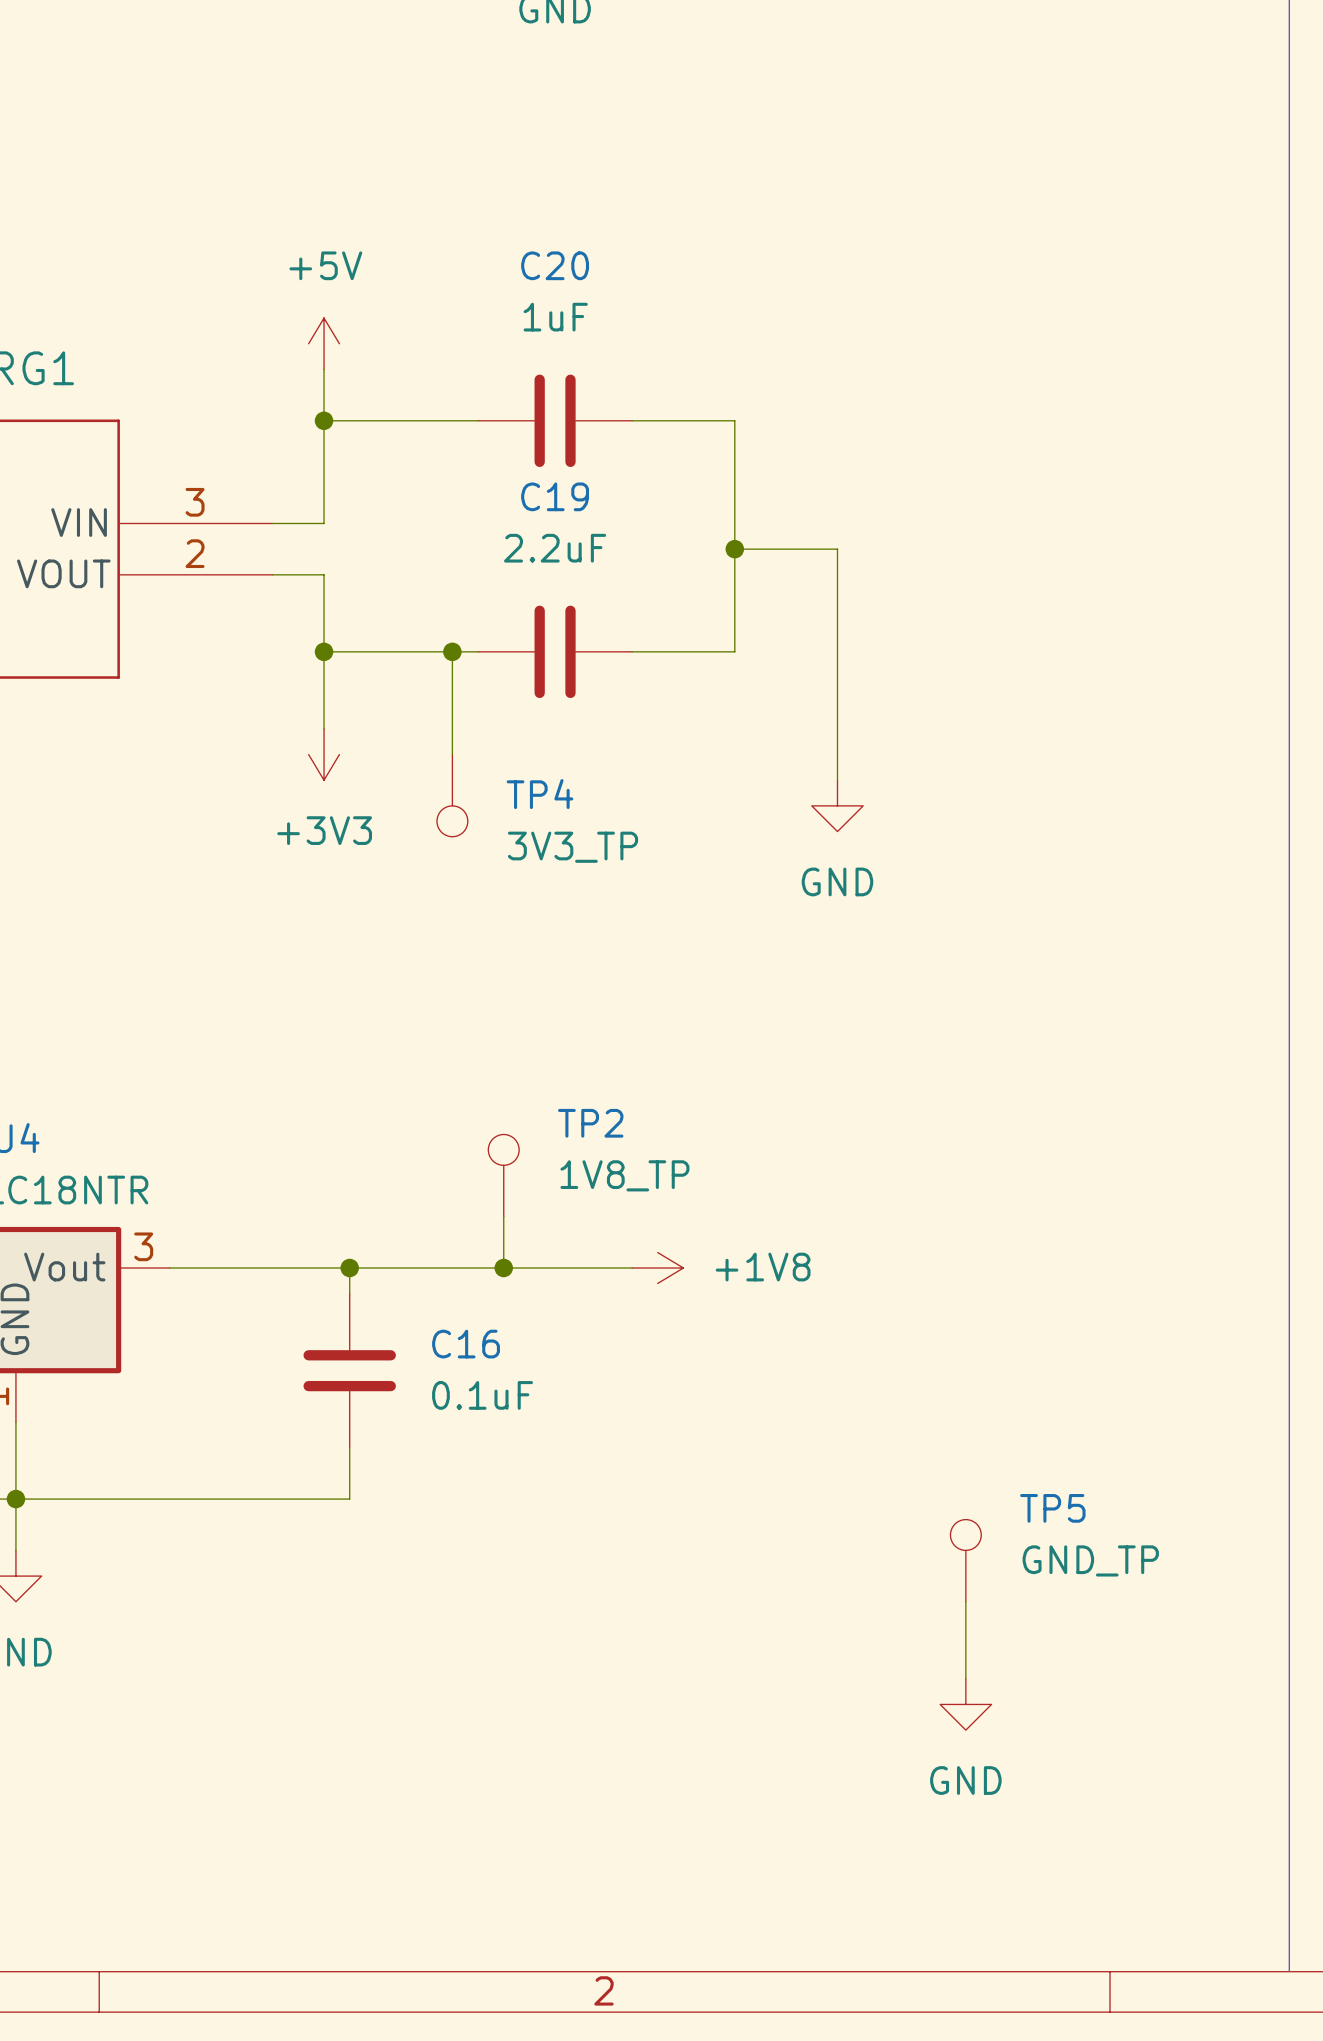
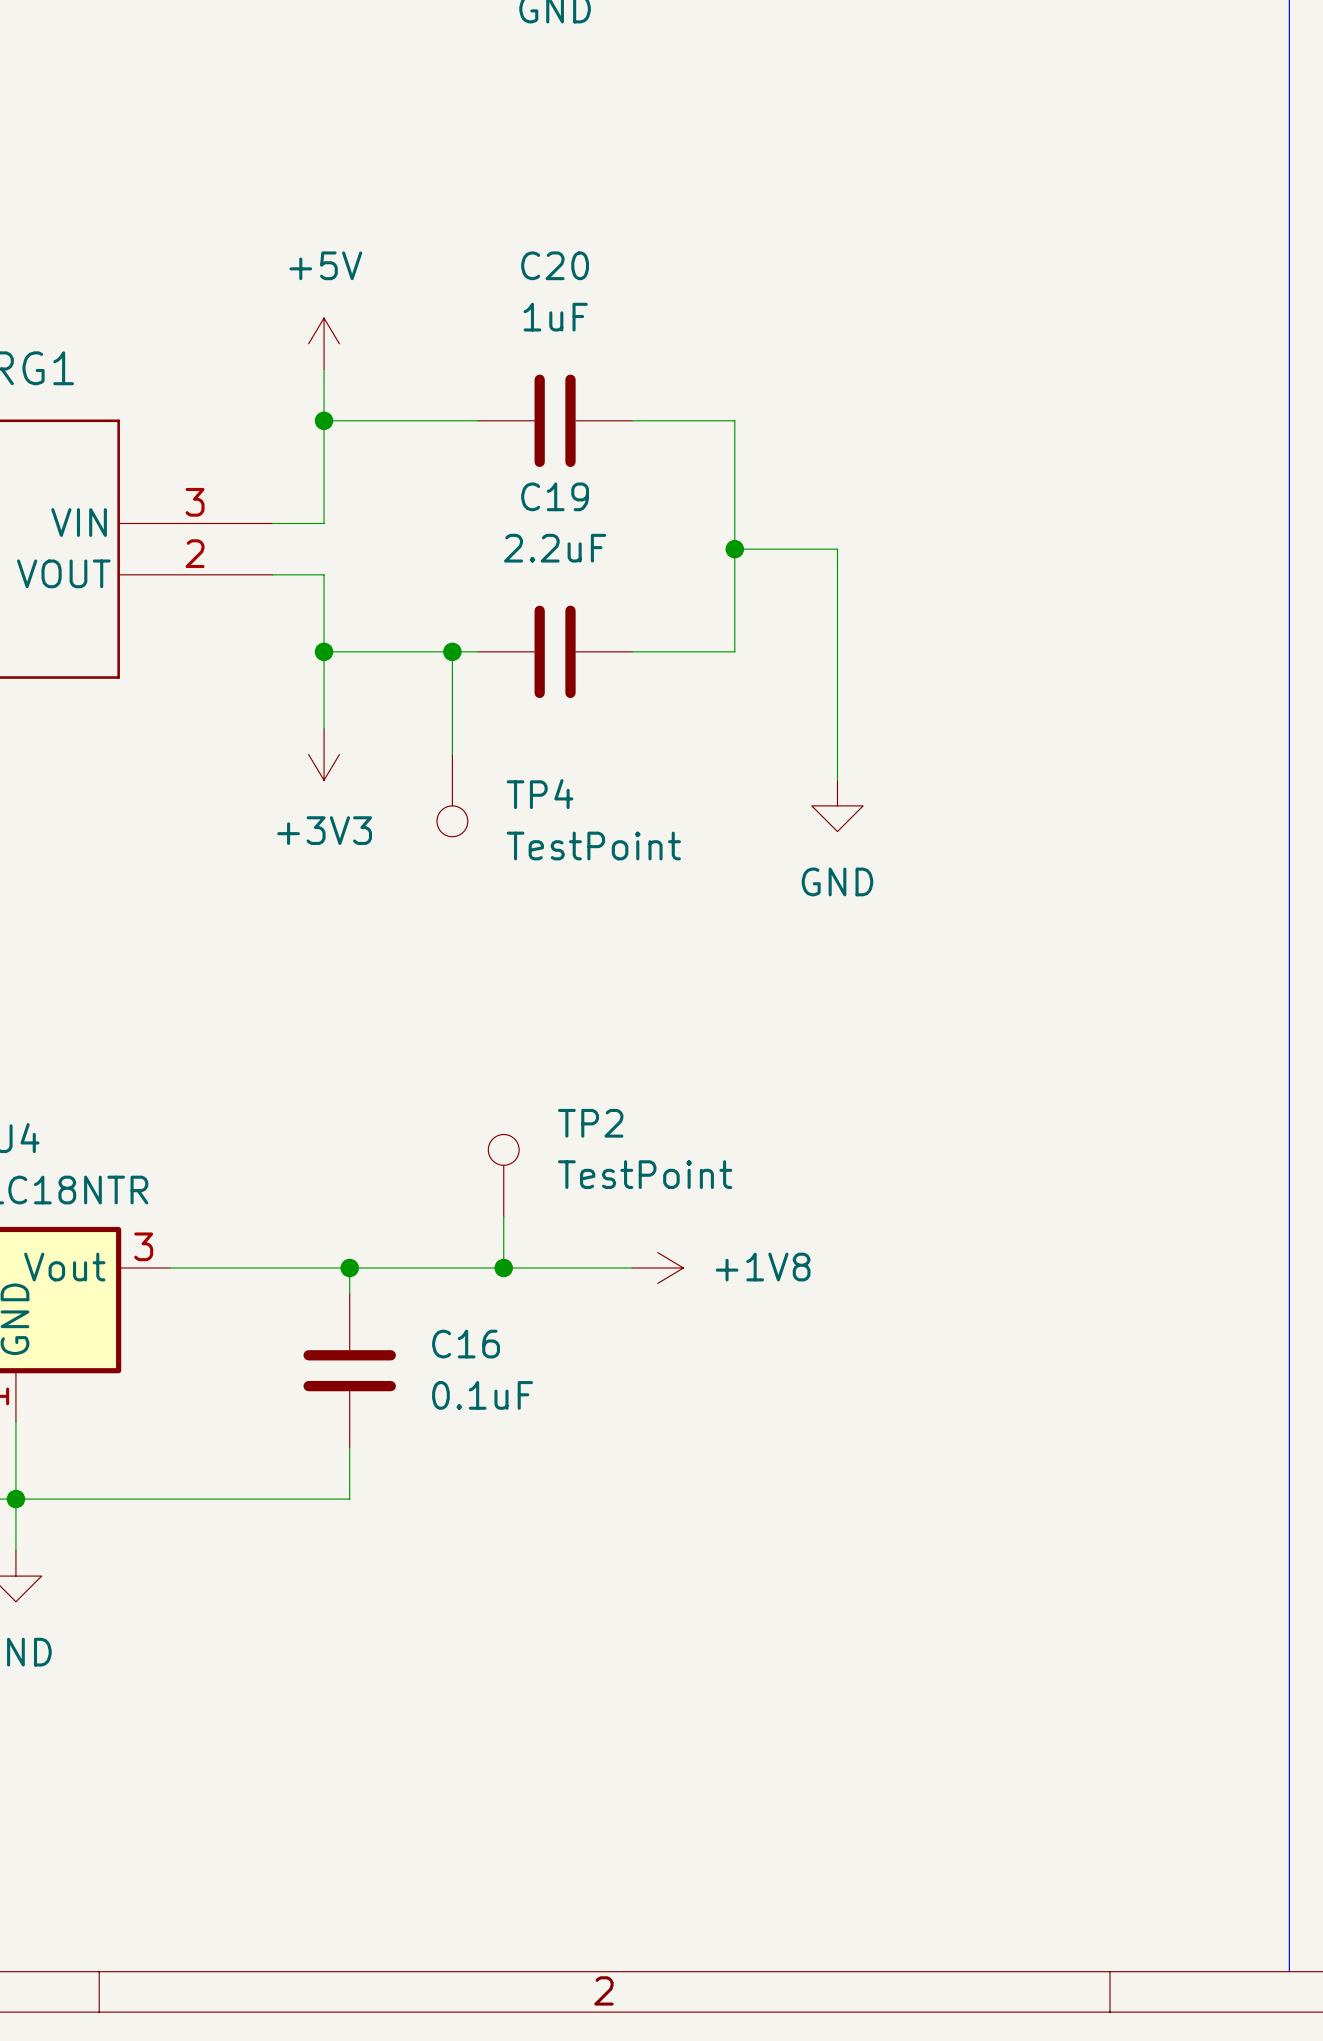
TP4 value: 3V3_TP (573, 847) -> TestPoint (593, 846)
TP2 value: 1V8_TP (624, 1175) -> TestPoint (645, 1174)
TP5: GND_TP (965, 1560) -> none
wire: (965, 1601) (965, 1678) -> none
power symbol: GND (965, 1704) -> none

